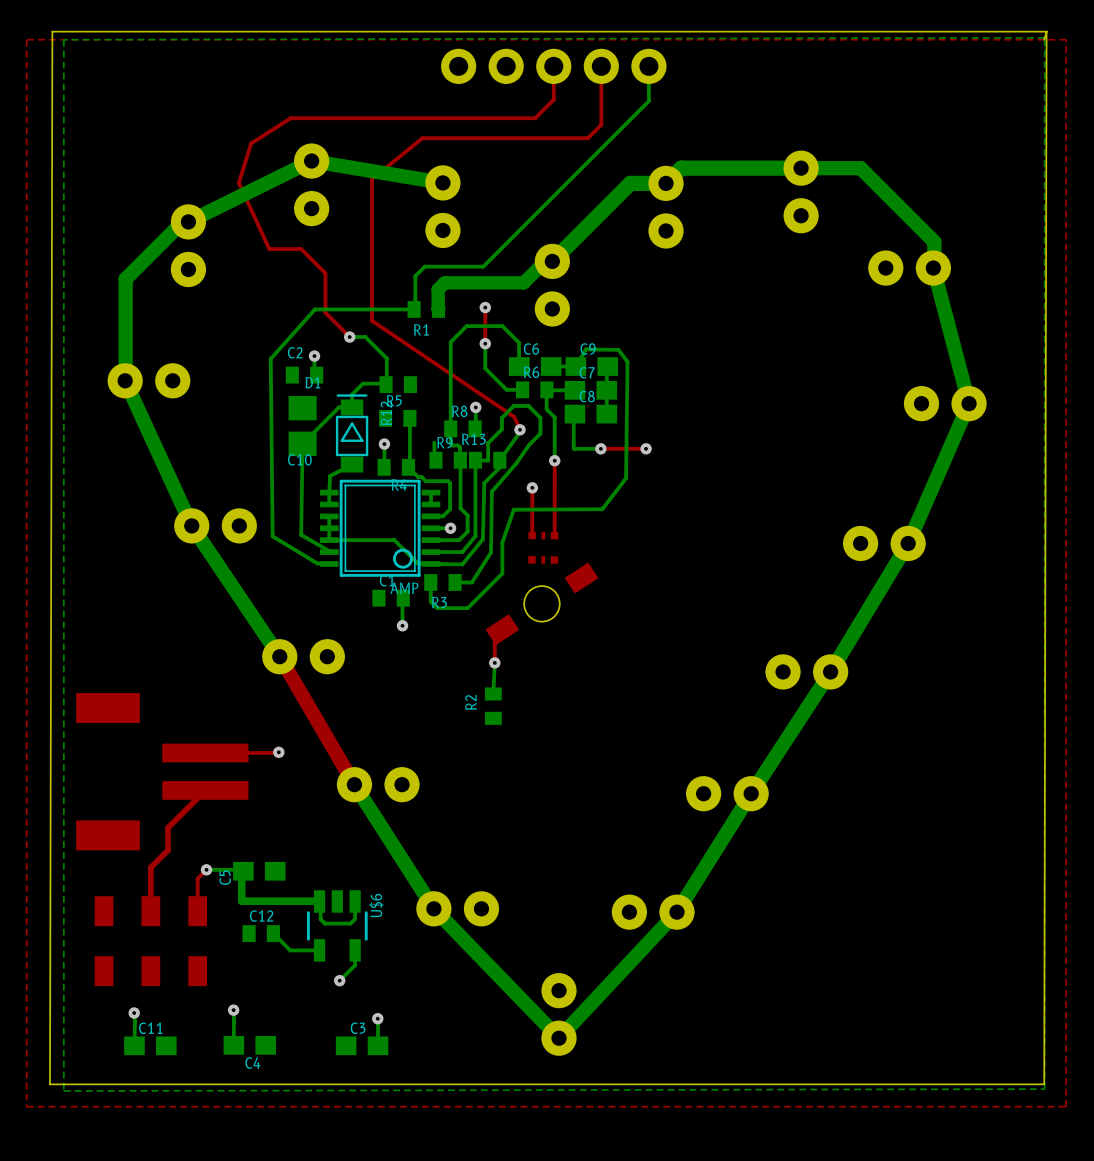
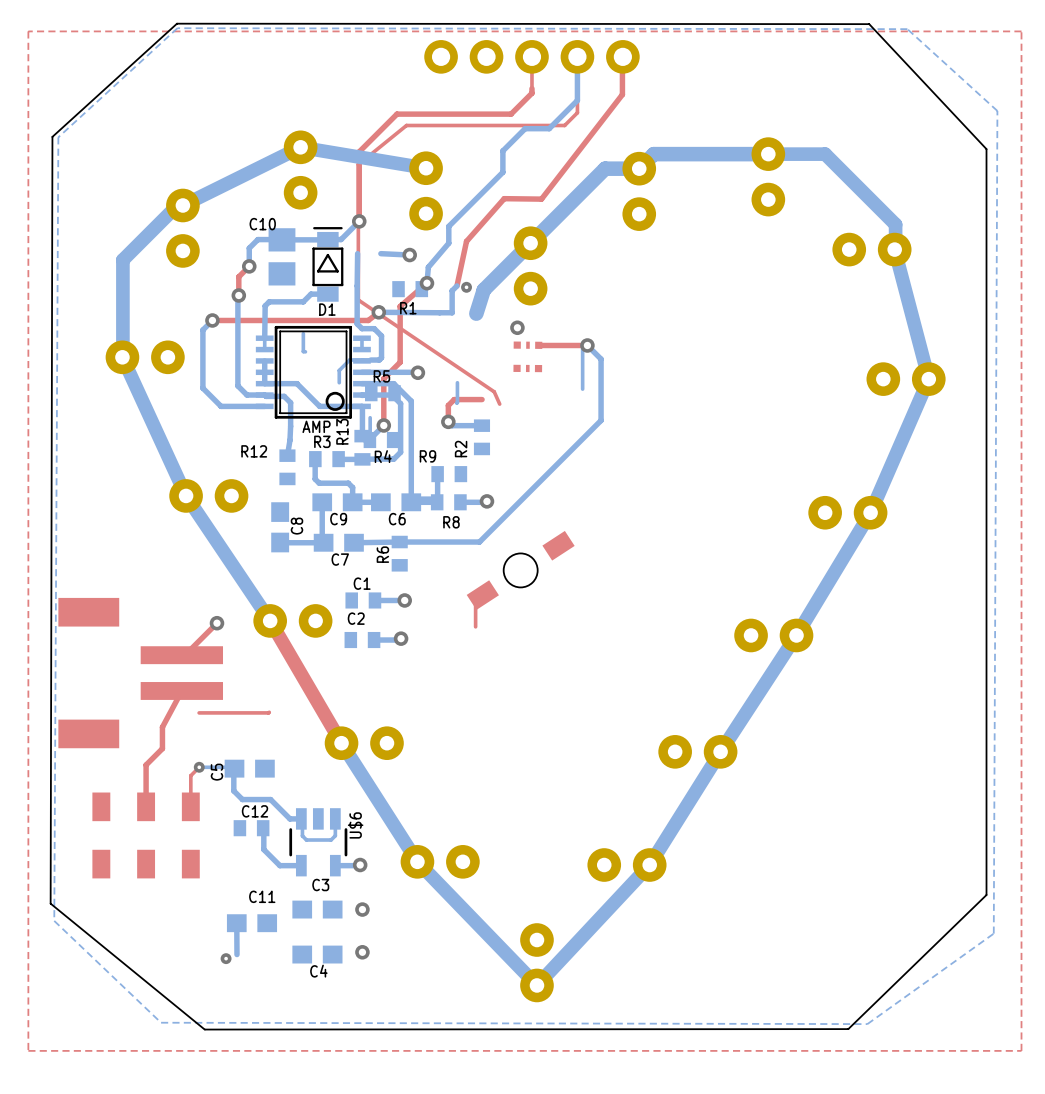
board edge: (1046, 31) (1044, 39) -> none
board edge: (1046, 31) (52, 31) (50, 1084) (1044, 1084) (1046, 31) -> none
bottom zone outline: (1044, 37) (1044, 1089) (63, 1091) (63, 39) (1044, 37) -> (177, 28) (907, 29) (997, 110) (993, 933) (867, 1024) (161, 1022) (54, 920) (58, 137) (177, 28)
bottom track: none -> (577, 56) (577, 100) (549, 128) (525, 128) (502, 150) (502, 172) (448, 226) (448, 243) (428, 267) (426, 283)
top track: none -> (622, 56) (622, 94) (541, 199) (504, 198) (466, 241) (456, 285)
bottom track: (648, 66) (648, 101) (483, 266) (424, 266) (415, 276) (414, 309) (314, 309) (270, 358) (272, 536) (317, 563) (329, 563) -> none
top track: (553, 99) (535, 118) (290, 118) (251, 143) (238, 182) (269, 249) (301, 249) (325, 273) (325, 312) (349, 337) -> (531, 88) (531, 93) (511, 114) (396, 114) (359, 151) (359, 221)
bottom track: none -> (359, 221) (341, 239) (257, 239) (249, 248) (249, 266)
via: none -> (359, 221)
bottom track: (552, 261) (545, 261) (523, 282) (444, 282) (438, 289) (438, 308) -> (530, 243) (483, 290) (476, 313)
bottom track: none -> (357, 253) (357, 323) (361, 328) (374, 328) (381, 335) (381, 357) (379, 360) (370, 360)
bottom track: none -> (380, 253) (409, 255)
via: none -> (409, 255)
top track: none -> (249, 266) (238, 276) (238, 295)
via: none -> (249, 266)
top track: none -> (426, 283) (400, 306) (400, 362) (383, 378) (383, 425)
via: none -> (426, 283)
bottom track: none -> (456, 285) (452, 290) (452, 312) (378, 312)
top track: (485, 307) (485, 343) -> none
bottom track: none -> (327, 294) (311, 294) (303, 301) (269, 301) (265, 305) (264, 349)
bottom track: none -> (238, 295) (237, 385) (246, 395) (284, 396) (290, 402) (289, 440) (287, 455)
via: none -> (238, 295)
R1 name rotation: 0° (421, 329) -> 0.1° counterclockwise (408, 308)
top track: none -> (378, 312) (368, 320) (212, 320)
via: none -> (378, 312)
bottom track: (349, 337) (365, 337) (386, 358) (386, 384) -> none
via: (349, 337) -> none
bottom track: none -> (212, 320) (202, 330) (202, 388) (221, 406) (264, 406)
via: none -> (212, 320)
bottom track: (485, 343) (485, 368) (506, 389) (522, 389) -> none
via: (485, 343) -> none
C6 name position: C6 (531, 349) -> C6 (397, 519)
via: none -> (517, 327)
C9 name position: C9 (588, 349) -> C9 (338, 519)
via: (314, 356) -> none
bottom track: (519, 366) (519, 342) (502, 326) (466, 326) (450, 342) (450, 443) (460, 447) (460, 508) (467, 515) (467, 531) (459, 540) (431, 540) -> none
C6 position: (535, 366) -> (396, 502)
bottom track: (551, 366) (575, 366) (585, 349) (618, 349) (627, 361) (626, 478) (602, 509) (513, 509) (502, 542) (502, 573) (467, 608) (437, 608) (430, 601) (430, 582) -> none
C9 position: (591, 366) -> (337, 502)
top track: none -> (587, 345) (538, 345)
bottom track: none -> (587, 345) (601, 359) (601, 420) (479, 542) (354, 542)
via: none -> (587, 345)
C7 name position: C7 (587, 372) -> C7 (340, 559)
C2 position: (304, 375) -> (362, 640)
D1 name position: D1 (313, 382) -> D1 (327, 309)
bottom track: none -> (264, 360) (264, 383) (296, 383) (319, 406) (361, 406) (362, 436) (373, 436) (383, 425)
R12 rotation: 0° (398, 384) -> 90° clockwise (287, 467)
R12 position: (398, 384) -> (287, 467)
R6 rotation: 0° (534, 389) -> 90° clockwise (399, 553)
R6 position: (534, 389) -> (399, 553)
bottom track: (574, 390) (546, 390) (546, 409) (554, 417) (553, 459) -> none
C7 position: (590, 390) -> (338, 542)
bottom track: none -> (361, 372) (417, 372)
via: none -> (417, 372)
bottom track: (355, 404) (352, 407) (338, 407) (302, 443) (301, 534) (329, 552) -> none
via: (475, 407) -> none
bottom track: none -> (361, 383) (393, 383) (411, 401) (411, 502) (437, 501) (437, 474)
R8 name position: R8 (459, 411) -> R8 (451, 522)
bottom track: (574, 414) (573, 448) (600, 448) -> none
C8 rotation: 0° (590, 414) -> 90° clockwise (280, 527)
C8 position: (590, 414) -> (280, 527)
bottom track: (409, 418) (408, 467) (418, 476) (421, 476) (425, 481) (448, 481) (450, 483) (450, 509) (442, 516) (431, 516) -> none
bottom track: none -> (362, 395) (391, 395) (400, 403) (400, 452) (393, 459) (338, 459)
C10 position: (302, 425) -> (281, 256)
top track: none -> (482, 399) (454, 399) (448, 405) (448, 421)
R8 position: (462, 428) -> (448, 502)
bottom track: (520, 429) (499, 460) (499, 467) (484, 483) (482, 539) (462, 564) (417, 563) (393, 539) (329, 540) (329, 516) -> none
via: (520, 429) -> none
D1 position: (352, 433) -> (327, 264)
bottom track: (434, 442) (435, 460) -> none
R9 name position: R9 (444, 442) -> R9 (427, 456)
via: (384, 444) -> none
bottom track: none -> (448, 421) (452, 425) (481, 425)
via: none -> (448, 421)
via: (600, 448) -> none
top track: (646, 448) (600, 448) -> none
via: (646, 448) -> none
via: none -> (383, 425)
C10 name position: C10 (299, 459) -> C10 (262, 224)
R9 position: (448, 460) -> (449, 474)
R13 rotation: 0° (487, 460) -> 90° clockwise (362, 447)
R13 position: (487, 460) -> (362, 447)
top track: (554, 460) (554, 535) -> none
via: (554, 460) -> none
bottom track: (352, 464) (330, 475) (329, 504) -> none
bottom track: none -> (315, 459) (315, 479) (319, 483) (348, 483) (352, 487) (352, 502) (380, 502)
top track: (532, 487) (532, 535) -> none
via: (532, 487) -> none
bottom track: (431, 492) (431, 504) -> (361, 338) (361, 349)
AMP position: (380, 528) -> (313, 372)
via: (450, 528) -> none
bottom track: none -> (486, 501) (460, 502)
via: none -> (486, 501)
bottom track: none -> (322, 502) (323, 542) (280, 542)
part position: (543, 547) -> (527, 356)
bottom track: (431, 552) (462, 552) (475, 536) (475, 460) (488, 460) (488, 443) (501, 429) (501, 417) (513, 406) (528, 406) (540, 417) (540, 433) (491, 491) (490, 552) (471, 582) (455, 582) -> none
R3 position: (442, 582) -> (326, 459)
AMP name position: AMP (404, 588) -> AMP (316, 426)
C1 position: (391, 598) -> (363, 600)
bottom track: (403, 598) (402, 625) -> none
R3 name position: R3 (439, 602) -> R3 (322, 441)
via: (402, 625) -> none
bottom track: none -> (404, 600) (374, 600)
via: none -> (404, 600)
top track: none -> (216, 623) (185, 655) (181, 655)
via: none -> (216, 623)
bottom track: (494, 662) (493, 694) -> none
via: (494, 662) -> none
bottom track: none -> (401, 638) (374, 640)
via: none -> (401, 638)
R2 name position: R2 (471, 702) -> R2 (461, 449)
R2 position: (493, 706) -> (481, 437)
top track: none -> (181, 690) (162, 727) (162, 748) (146, 765) (146, 806)
via: (278, 752) -> none
part position: (162, 771) -> (140, 673)
top track: (205, 790) (167, 827) (167, 850) (150, 867) (150, 911) -> none
bottom track: none -> (199, 767) (233, 767) (233, 790) (242, 799) (270, 799) (289, 818) (301, 818) (302, 835) (306, 840) (331, 840) (335, 835) (335, 818)
via: none -> (199, 767)
top track: (206, 869) (197, 878) (197, 911) -> (199, 767) (190, 775) (190, 806)
bottom track: (206, 869) (241, 869) (241, 901) (319, 901) -> none
via: (206, 869) -> none
C5 position: (259, 871) -> (249, 768)
bottom track: none -> (263, 828) (263, 849) (279, 865) (301, 865)
bottom track: (355, 901) (355, 919) (350, 923) (324, 923) (320, 919) (319, 901) -> none
bottom track: none -> (360, 865) (335, 865)
via: none -> (360, 865)
U$6 position: (337, 925) -> (318, 842)
C12 position: (261, 933) -> (251, 828)
bottom track: (273, 933) (290, 950) (319, 950) -> none
part position: (150, 941) -> (146, 835)
bottom track: (355, 950) (355, 965) (339, 980) -> none
via: none -> (362, 909)
bottom track: none -> (236, 923) (236, 954)
via: (339, 980) -> none
via: none -> (362, 952)
bottom track: (233, 1010) (233, 1045) -> none
bottom track: (134, 1013) (134, 1045) -> none
via: (134, 1013) -> none
bottom track: (377, 1018) (377, 1045) -> none
via: (377, 1018) -> none
C11 name position: C11 (150, 1028) -> C11 (262, 896)
C3 name position: C3 (358, 1028) -> C3 (320, 885)
C11 position: (150, 1045) -> (251, 923)
C4 position: (249, 1045) -> (317, 954)
C3 position: (362, 1045) -> (317, 909)
board edge: none -> (205, 1029) (848, 1029) (986, 895) (986, 149) (869, 24) (176, 23) (52, 136) (50, 903) (204, 1029)

